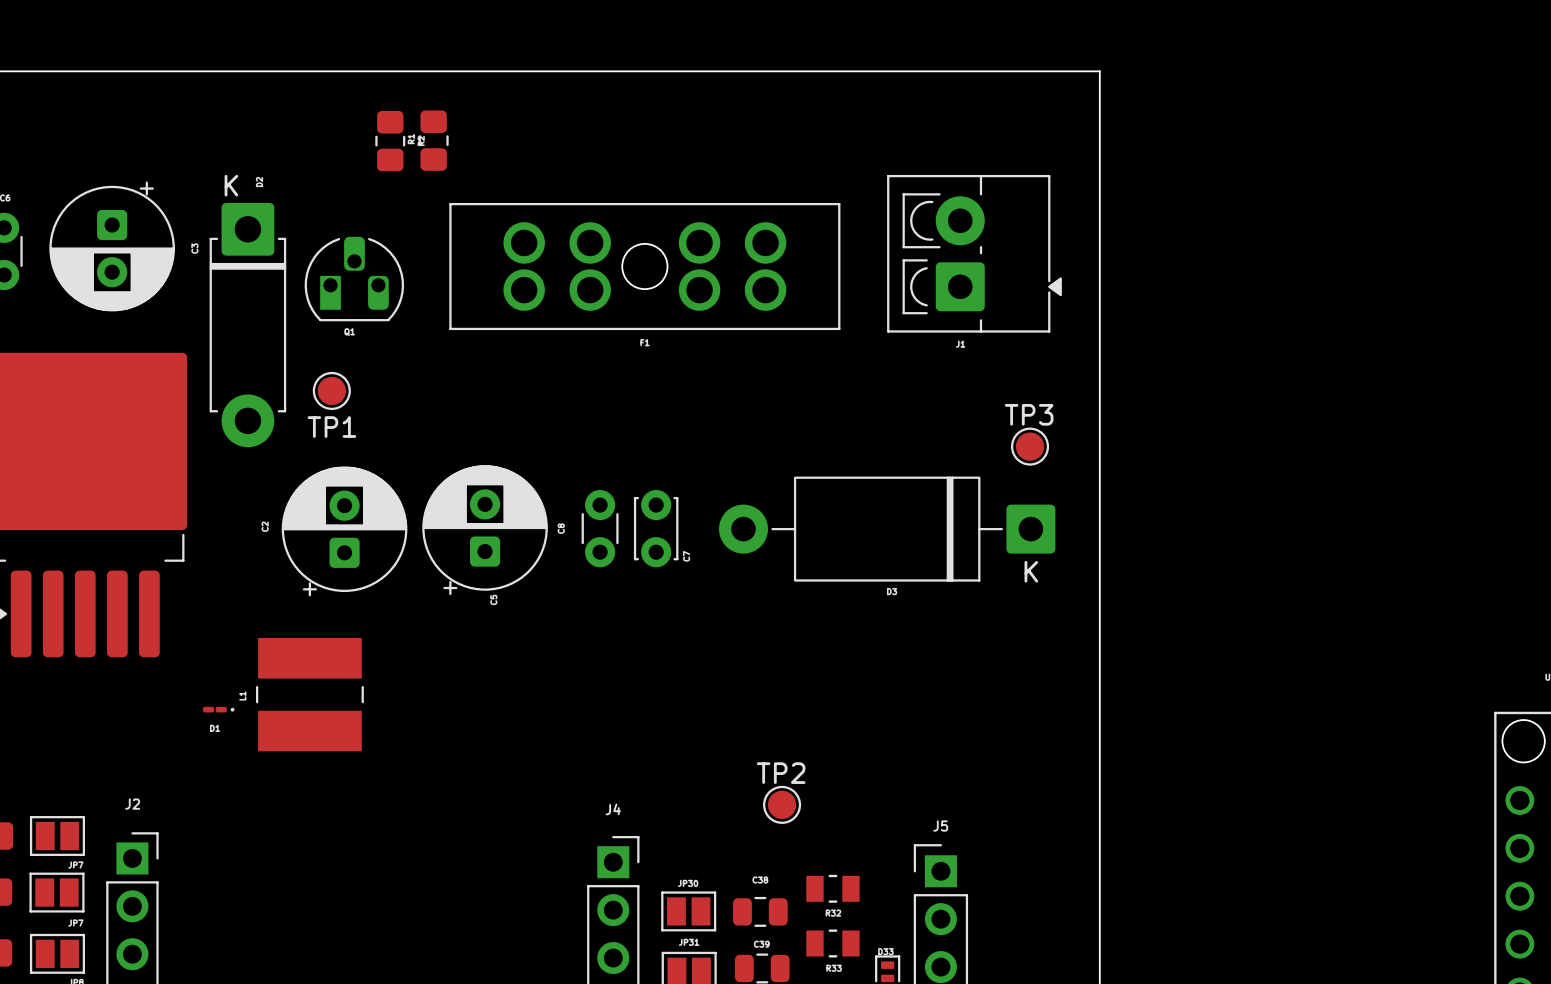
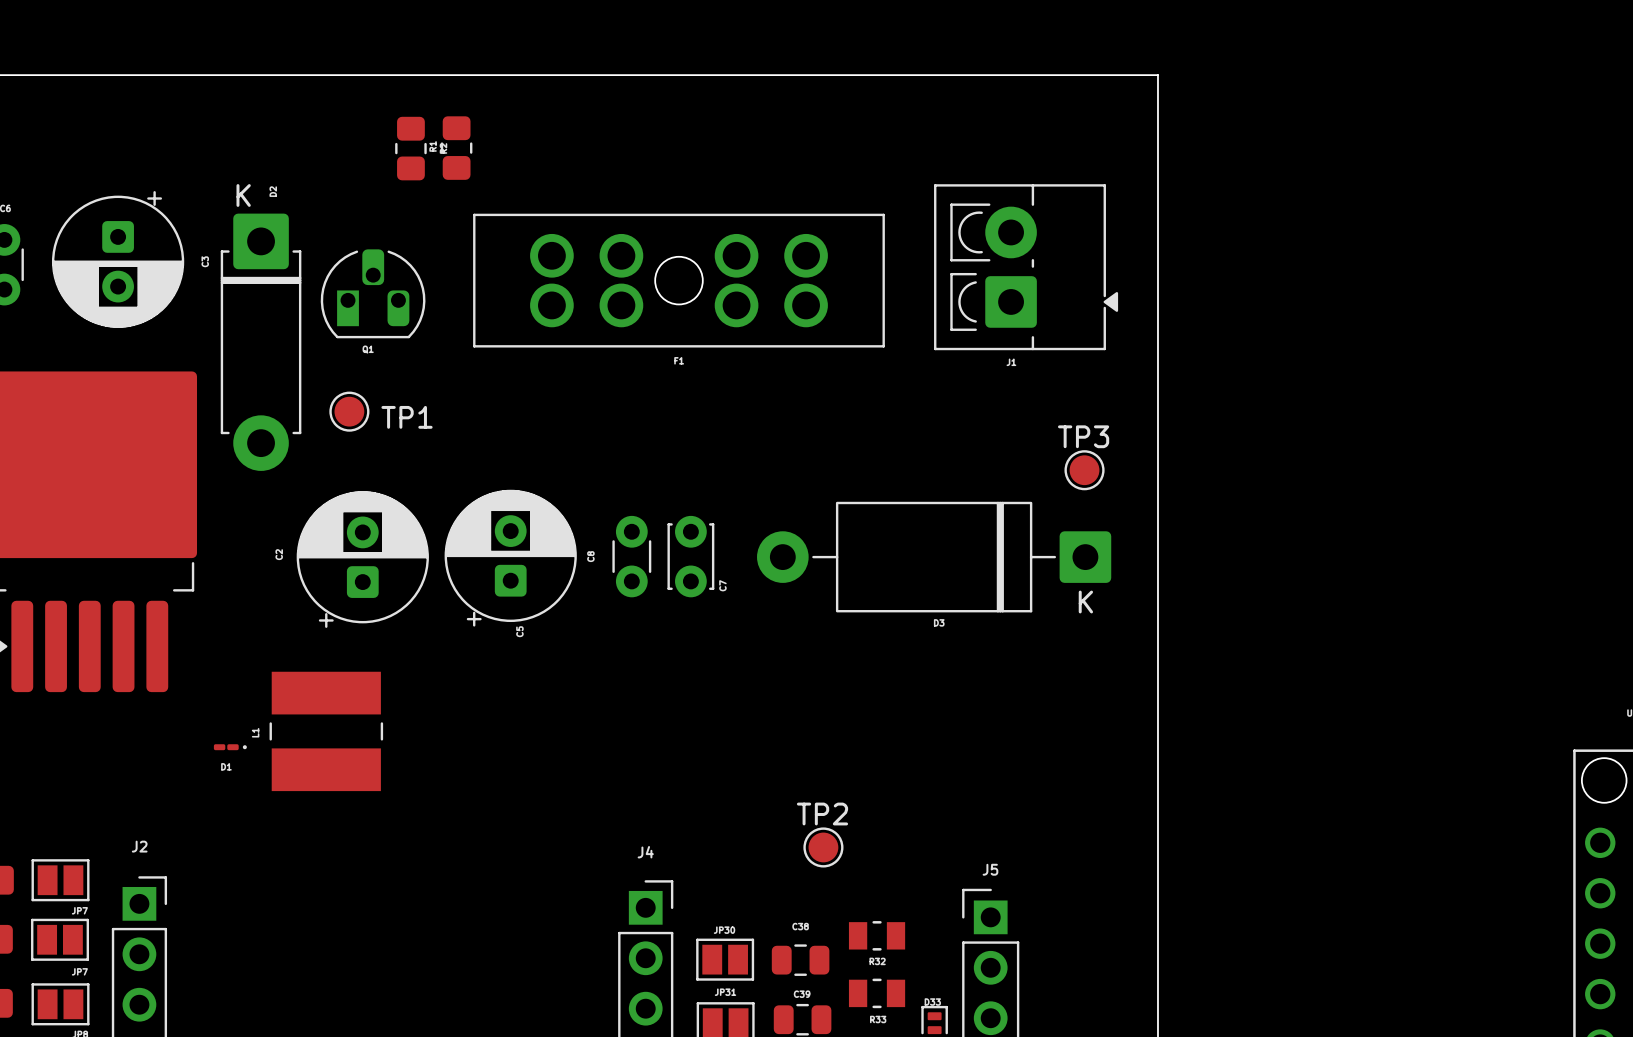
TP1 name position: TP1 (331, 427) -> TP1 (407, 417)

